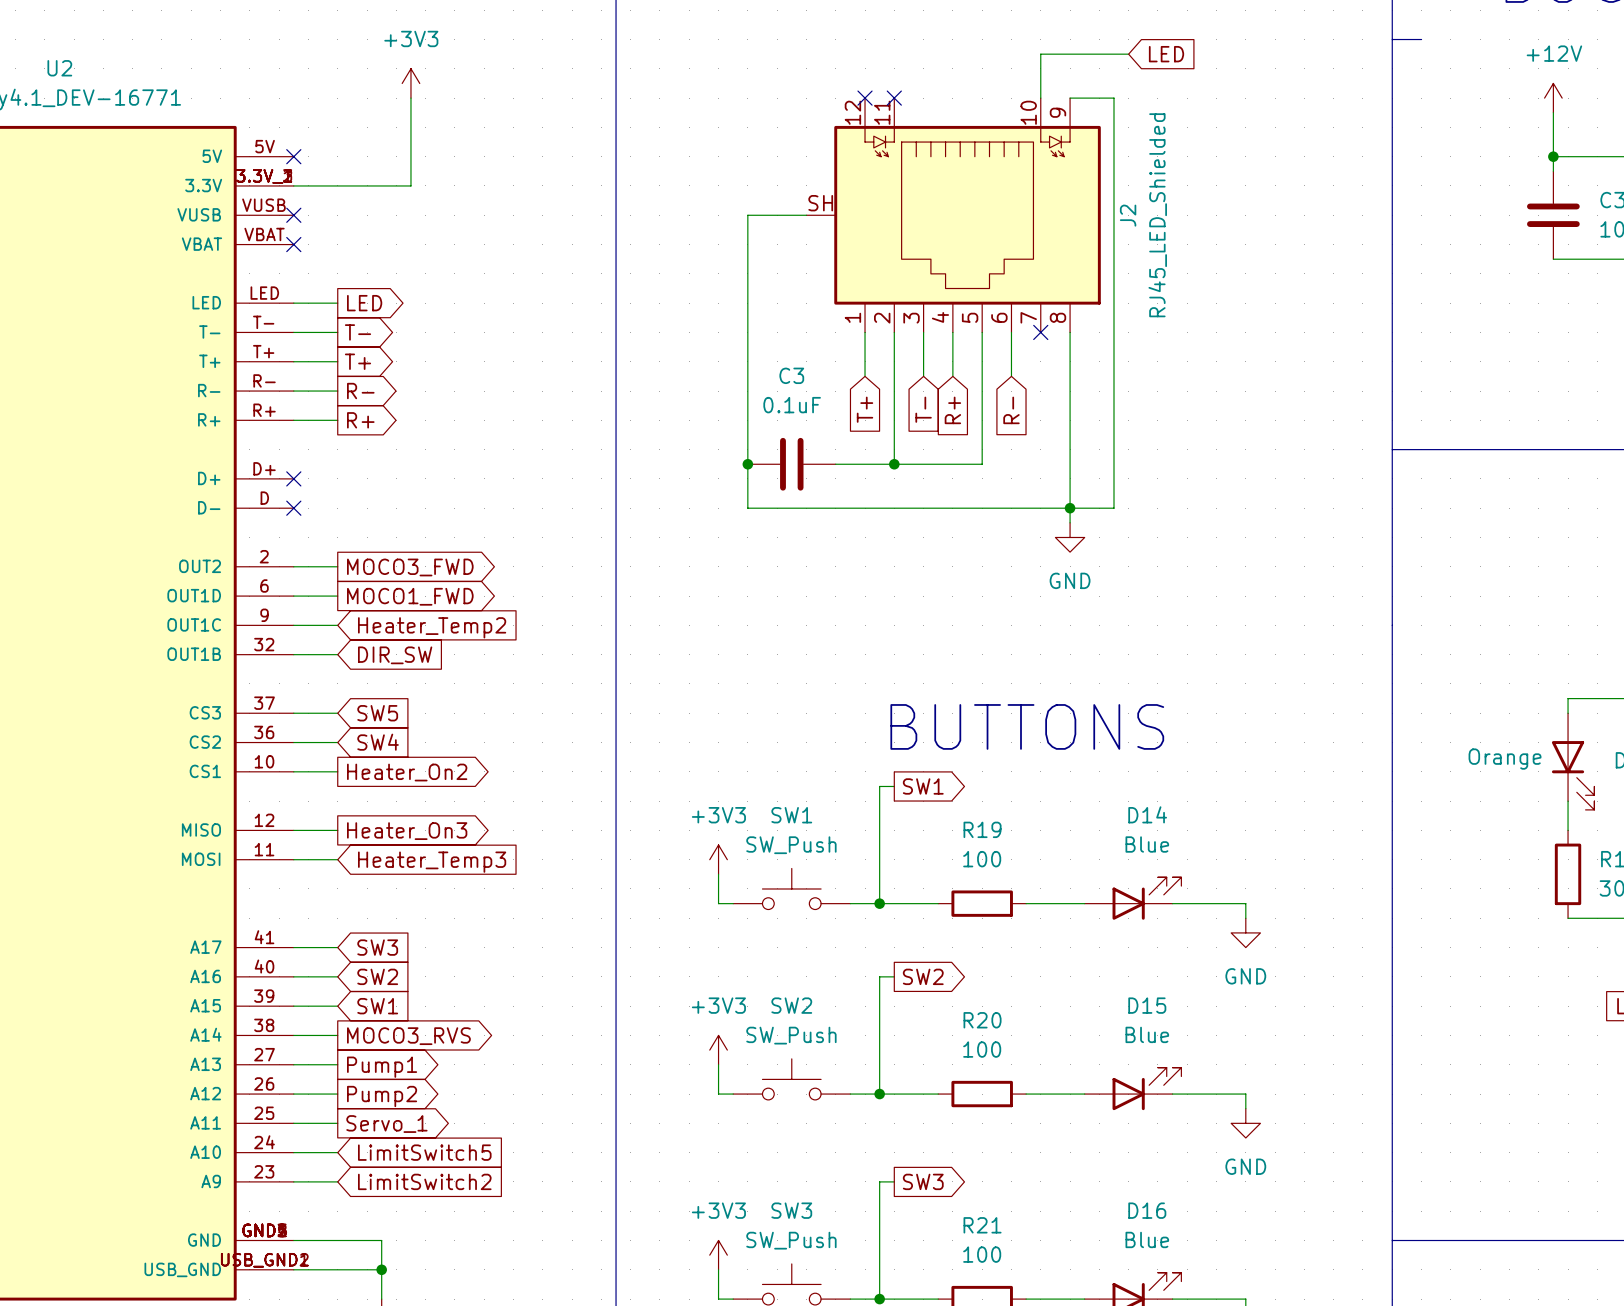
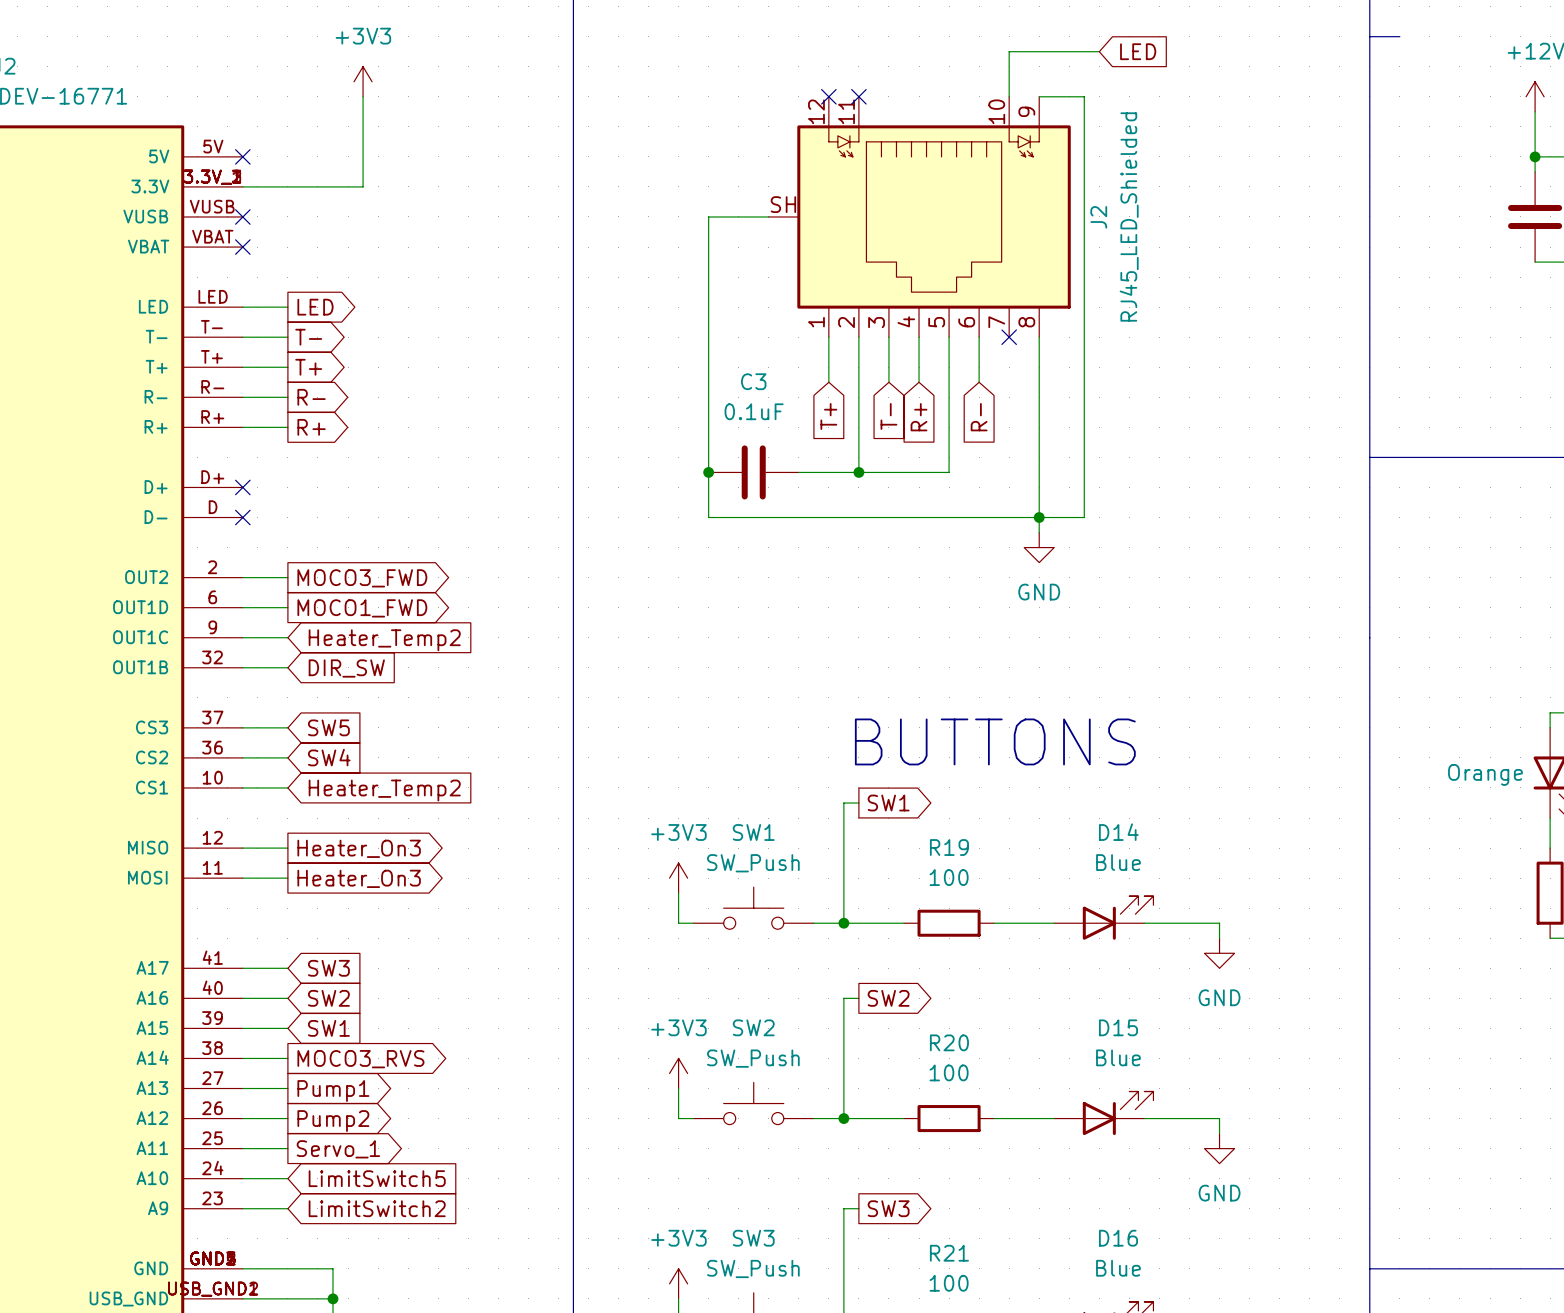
global label shape: output (407, 772) -> input (384, 790)
global label: Heater_On2 (407, 772) -> Heater_Temp2 (384, 790)
global label shape: input (432, 862) -> output (359, 878)
global label: Heater_Temp3 (432, 862) -> Heater_On3 (359, 878)

